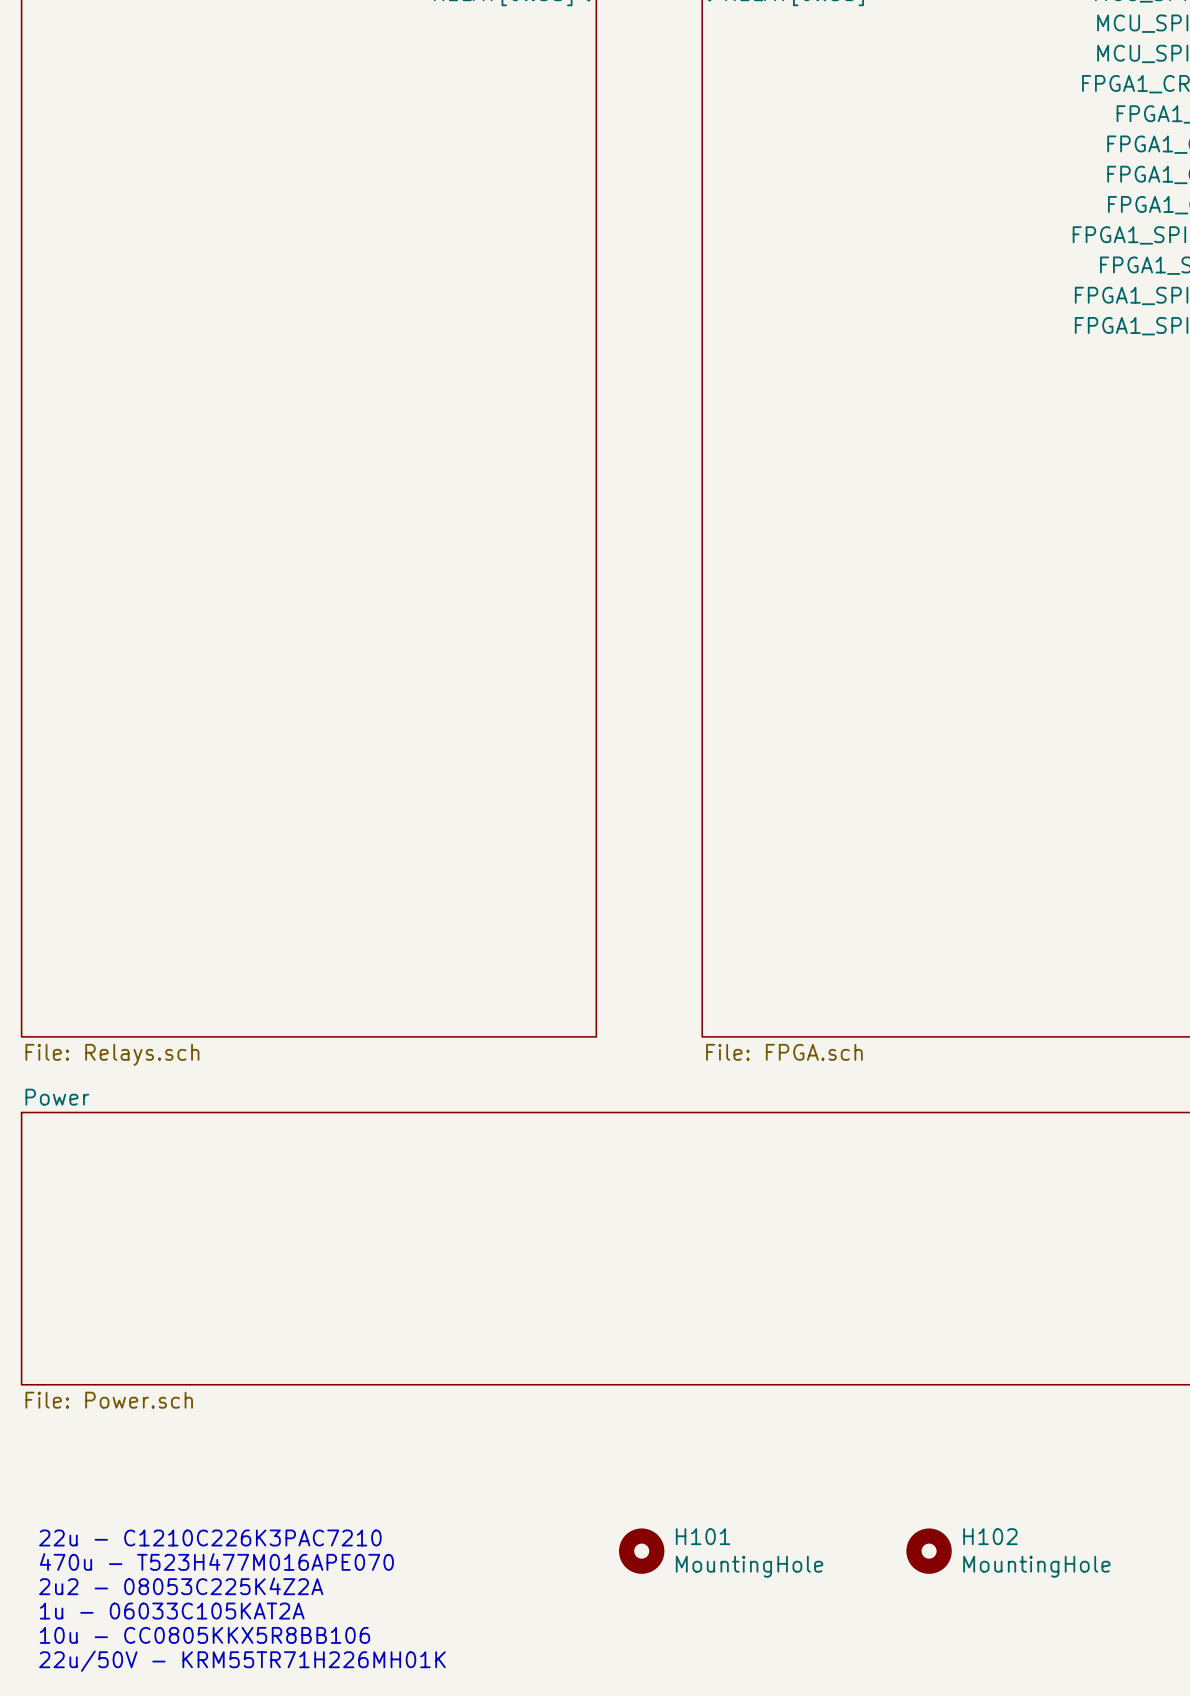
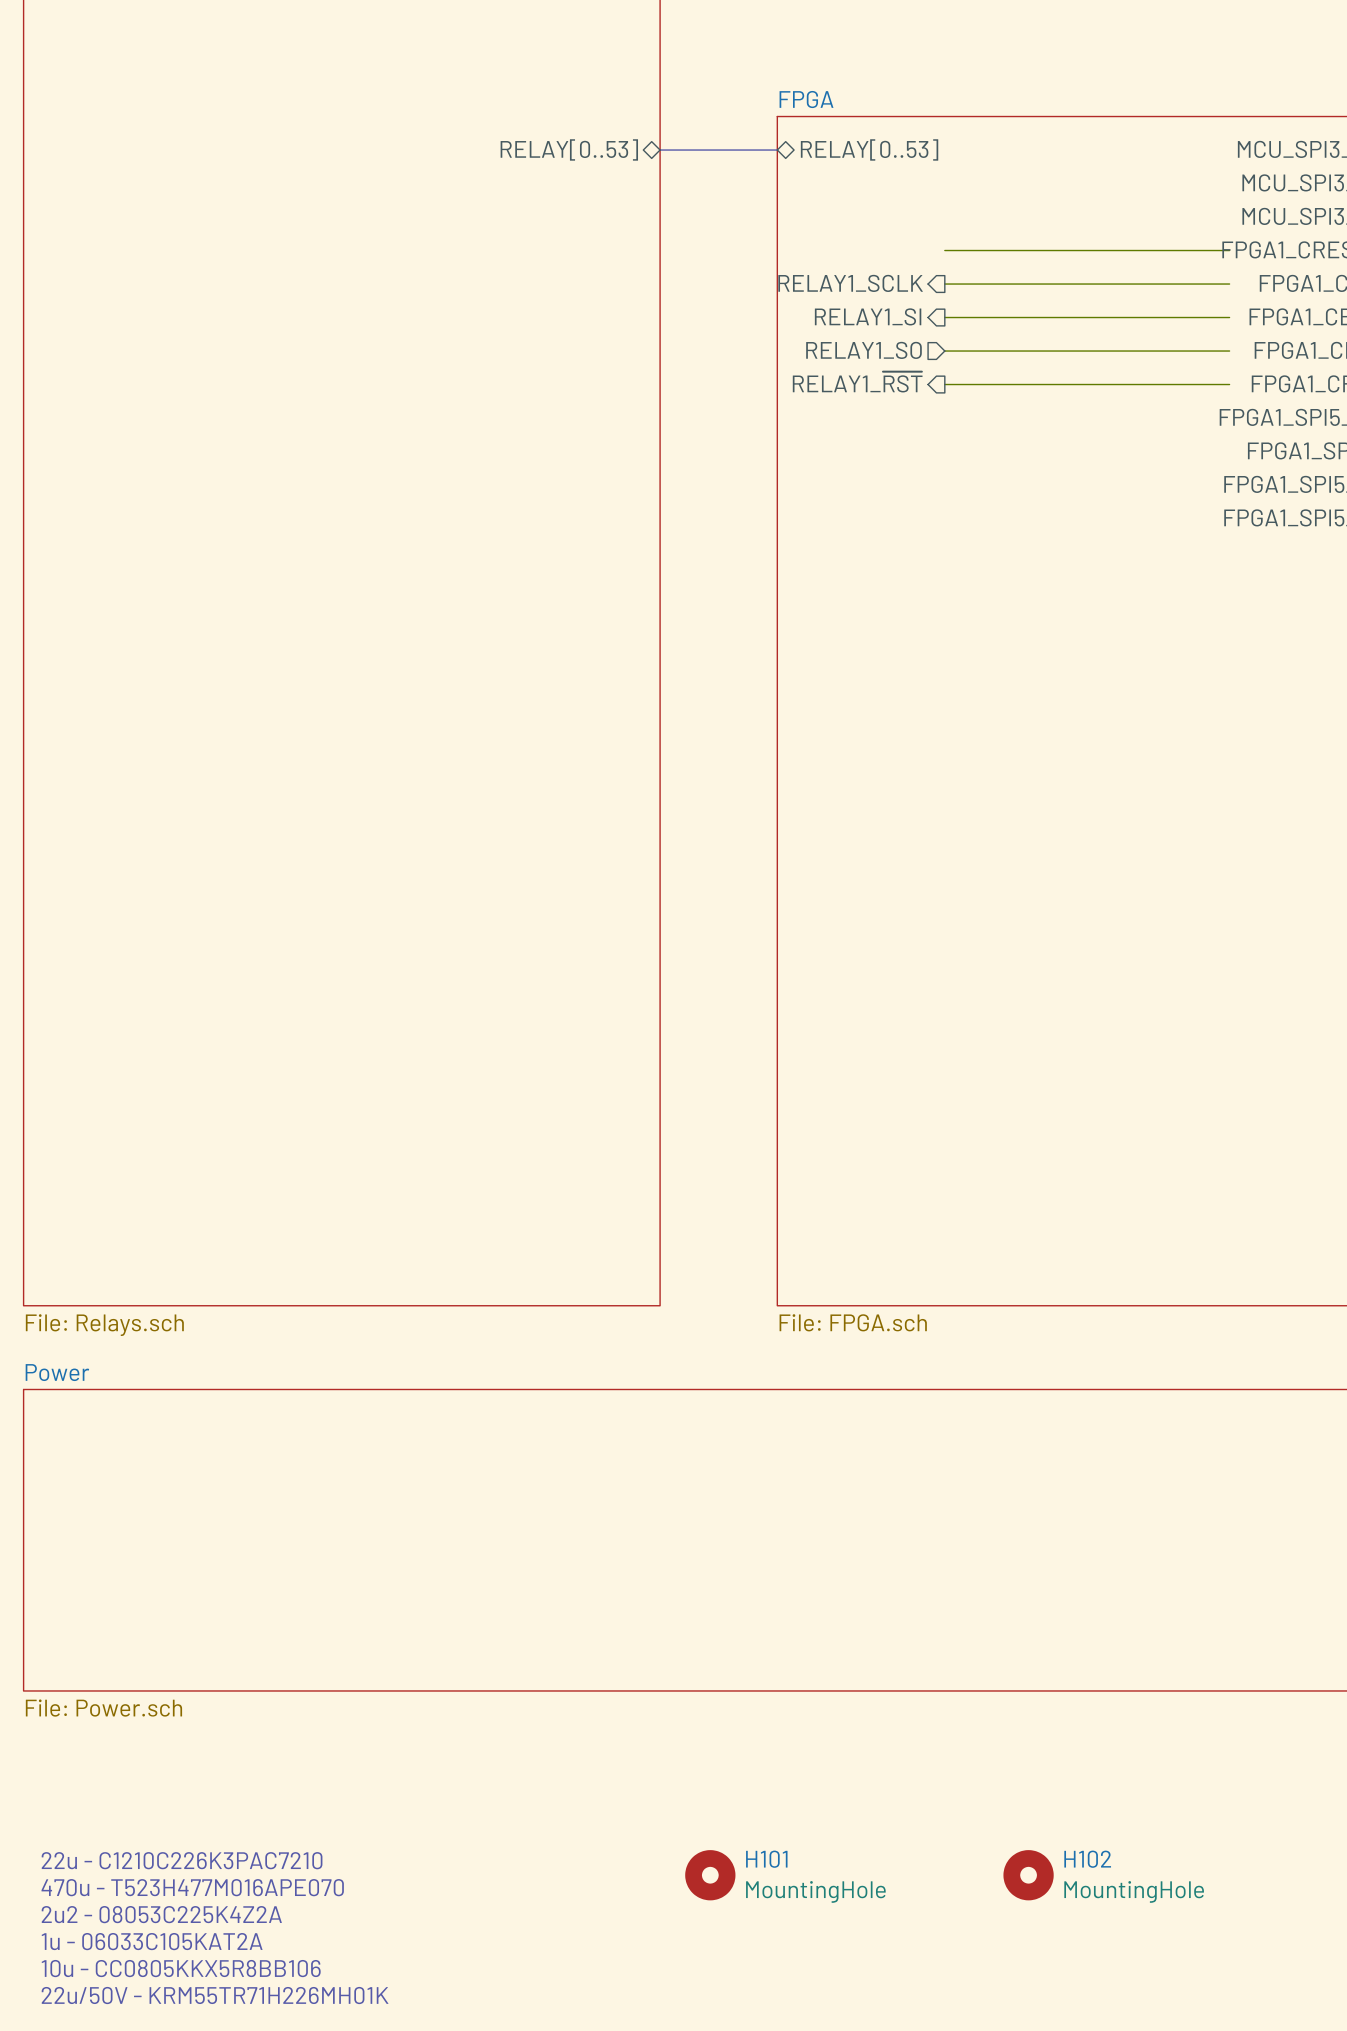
wire: none -> (944, 250) (1229, 250)
sheet pin: none -> RELAY1_SCLK (850, 283)
wire: none -> (944, 284) (1229, 284)
sheet pin: none -> RELAY1_SI (868, 316)
wire: none -> (944, 317) (1229, 317)
sheet pin: none -> RELAY1_SO (863, 350)
wire: none -> (944, 351) (1229, 351)
sheet pin: none -> RELAY1_~{RST} (857, 382)
wire: none -> (944, 384) (1229, 384)

